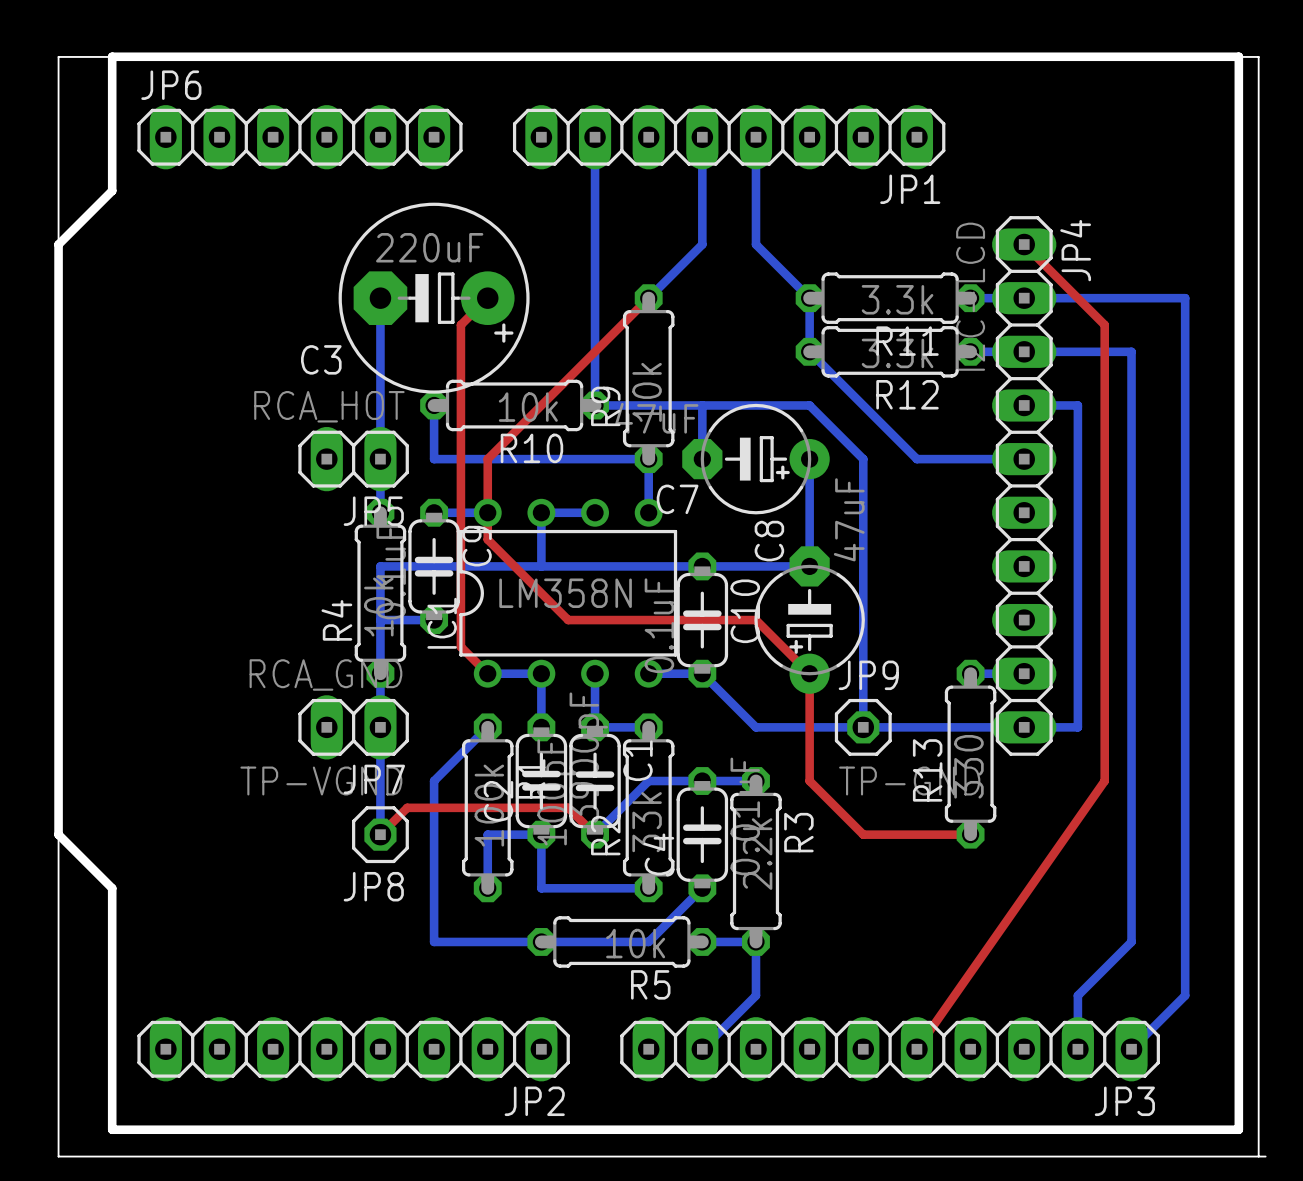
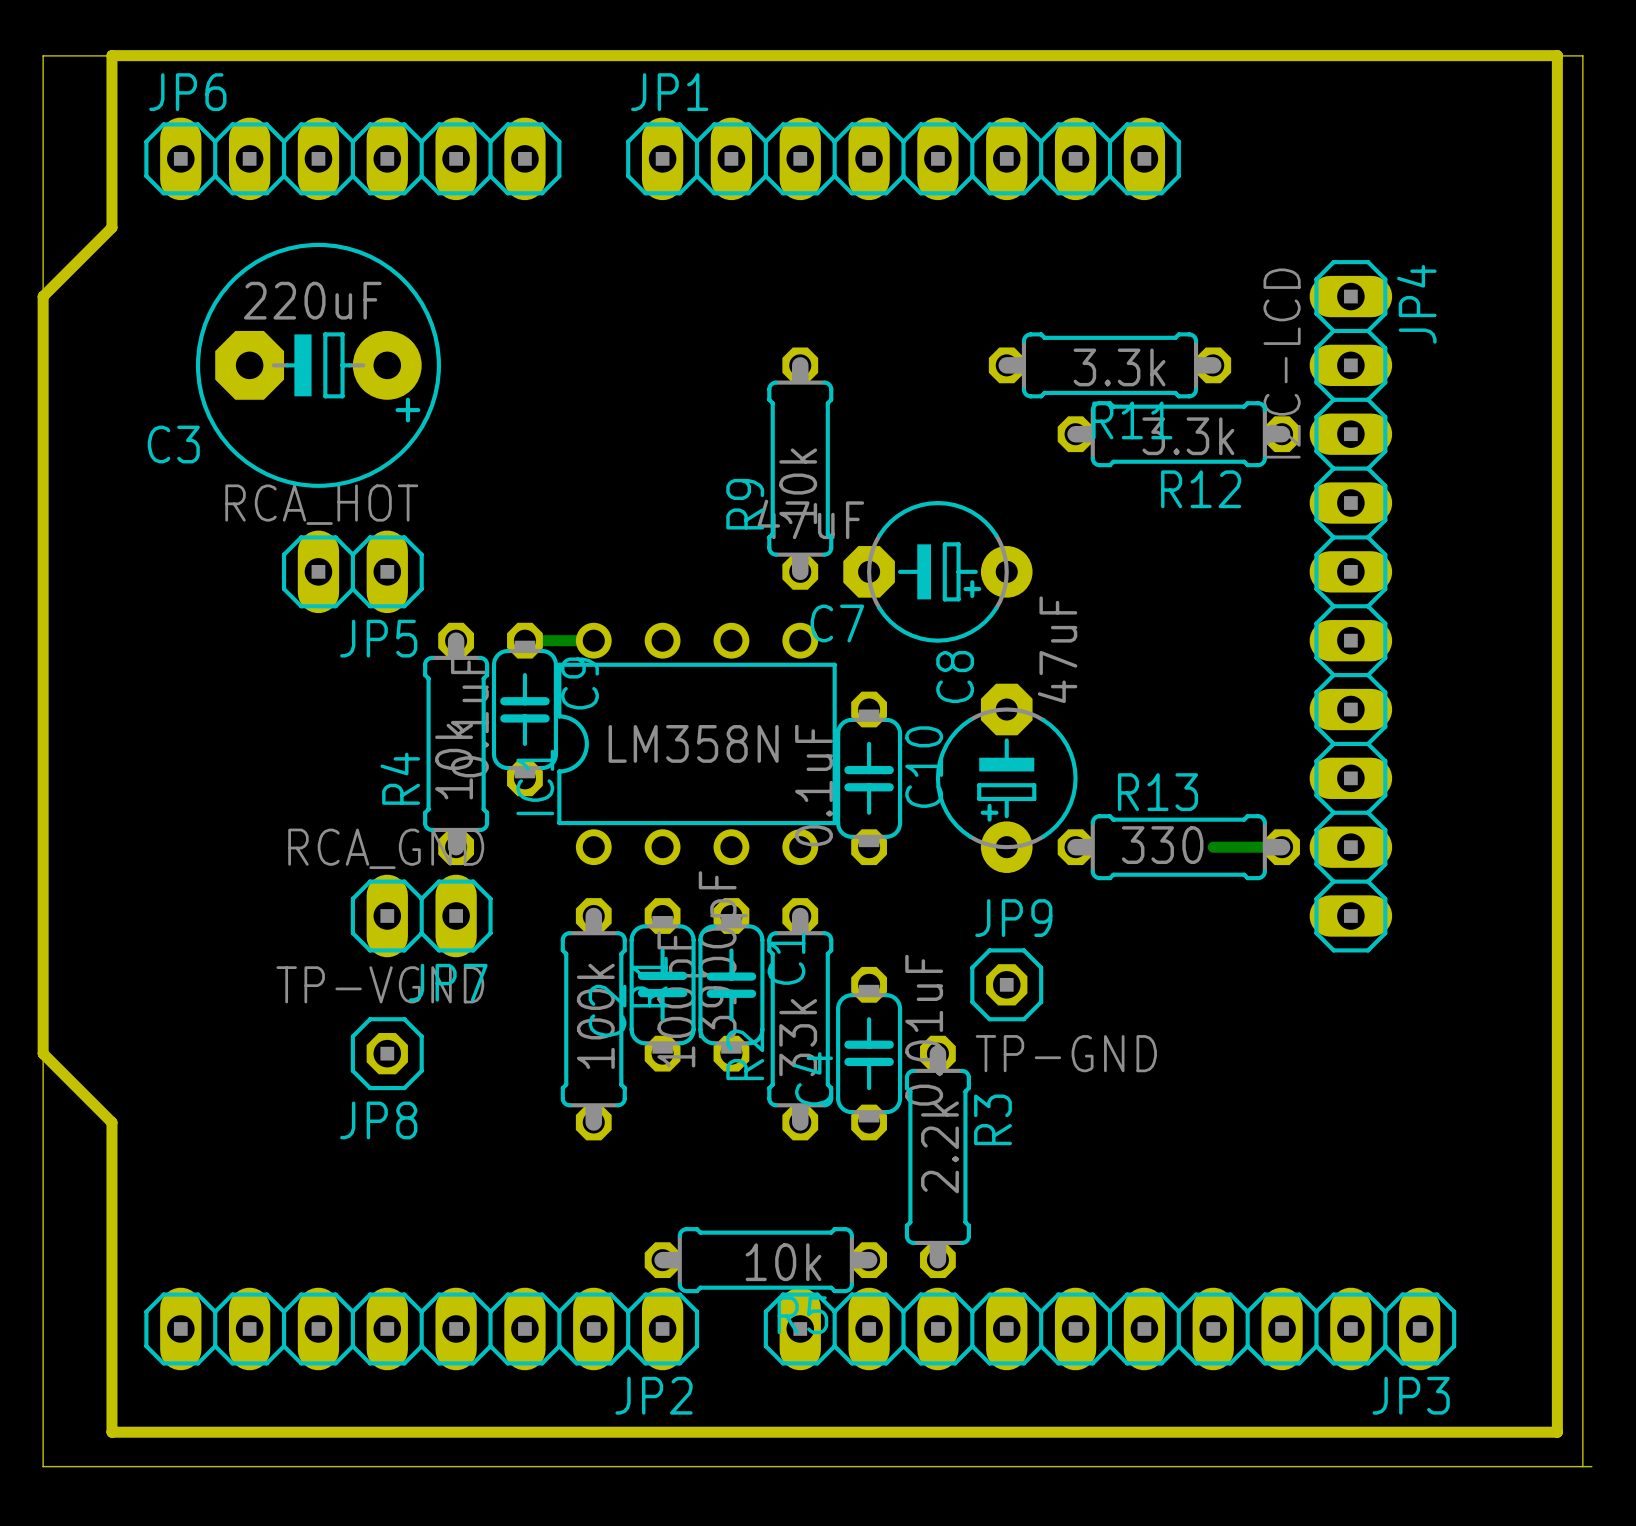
bottom track: (595, 137) (595, 405) (809, 405) (863, 459) (863, 727) -> none
bottom track: (702, 137) (702, 244) (648, 298) -> none
bottom track: (755, 137) (755, 244) (809, 298) (809, 351) (916, 459) (1024, 459) -> none
JP1 name position: JP1 (910, 189) -> JP1 (669, 92)
top track: (1024, 244) (1104, 325) (1104, 781) (916, 1049) -> none
bottom track: (380, 298) (380, 512) -> none
C3 position: (434, 298) -> (318, 365)
top track: (487, 298) (460, 325) (460, 646) (487, 673) -> none
top track: (648, 298) (487, 459) (487, 539) (568, 620) (755, 620) (809, 673) (809, 781) (863, 834) (970, 834) -> none
bottom track: (970, 298) (1185, 298) (1185, 995) (1131, 1049) -> none
R12 position: (890, 351) -> (1178, 434)
bottom track: (970, 351) (1131, 351) (1131, 941) (1077, 995) (1077, 1049) -> none
bottom track: (434, 405) (434, 459) (648, 459) (648, 512) -> none
R10: 10k (514, 405) -> none
bottom track: (702, 405) (702, 459) -> none
bottom track: (1024, 405) (1077, 405) (1077, 727) (755, 727) (702, 673) (648, 673) -> none
JP5 position: (353, 459) -> (352, 571)
bottom track: (809, 459) (809, 566) (380, 566) (380, 834) -> none
JP4 position: (1024, 485) -> (1350, 606)
bottom track: (595, 512) (541, 512) (541, 566) -> none
bottom track: (380, 620) (434, 620) -> none
bottom track: (487, 673) (541, 673) (541, 727) -> none
bottom track: (595, 673) (595, 727) (648, 727) -> none
bottom track: (487, 727) (434, 781) (434, 941) (648, 941) (702, 888) -> none
JP9 position: (863, 727) -> (1006, 984)
R13 rotation: 0° (970, 754) -> 90° clockwise (1178, 847)
bottom track: (755, 781) (648, 781) (595, 834) -> none
top track: (380, 834) (407, 807) (568, 807) (595, 834) -> none
JP8 position: (380, 834) -> (387, 1053)
R3 position: (755, 861) -> (937, 1156)
bottom track: (487, 888) (487, 834) (541, 834) (541, 888) (648, 888) -> none
R5 position: (621, 941) -> (765, 1260)
bottom track: (702, 941) (755, 941) (755, 995) (702, 1049) -> none

